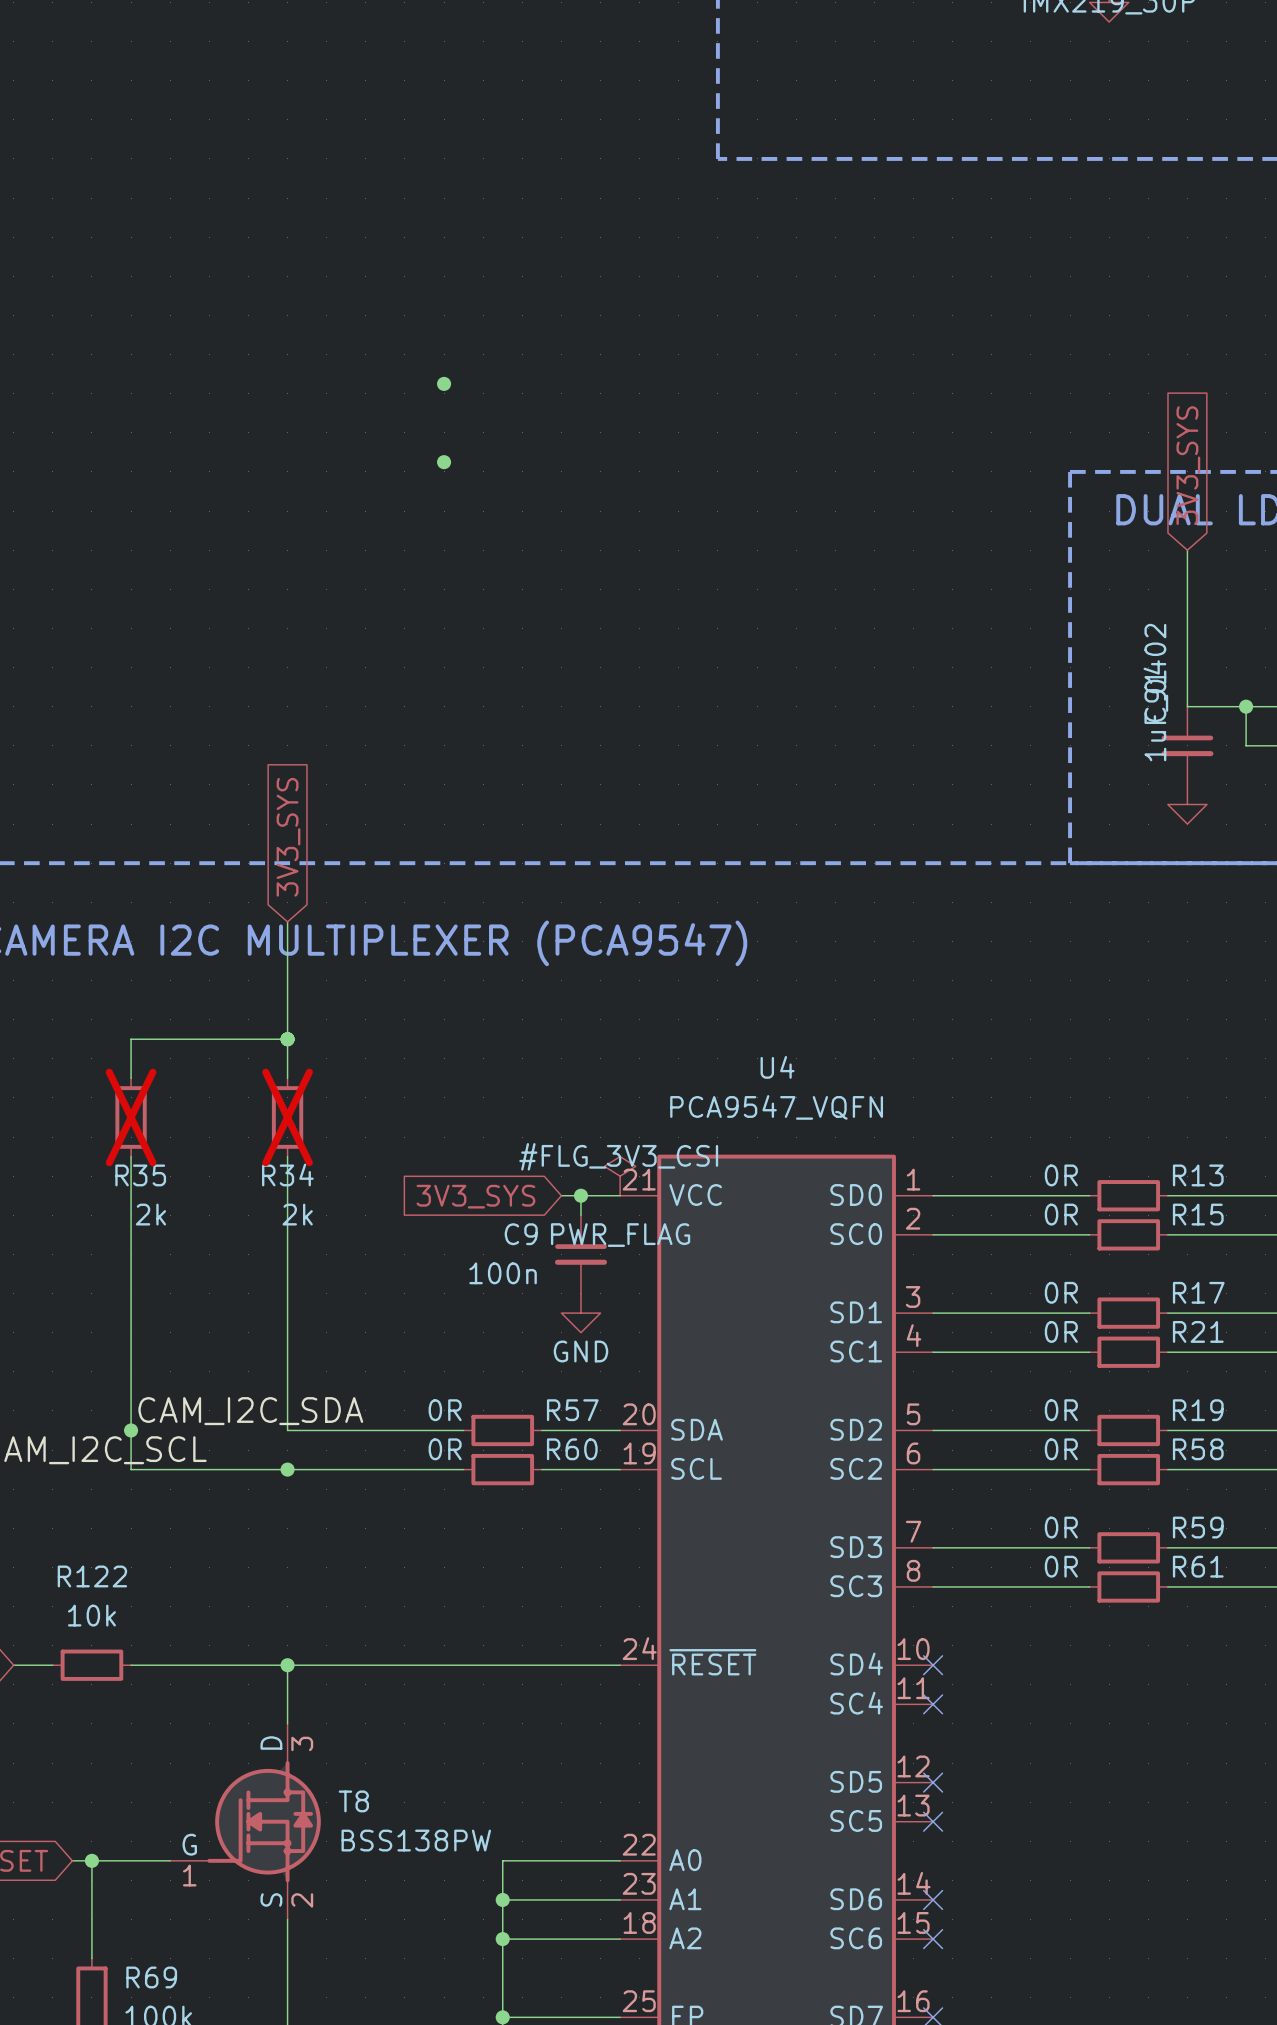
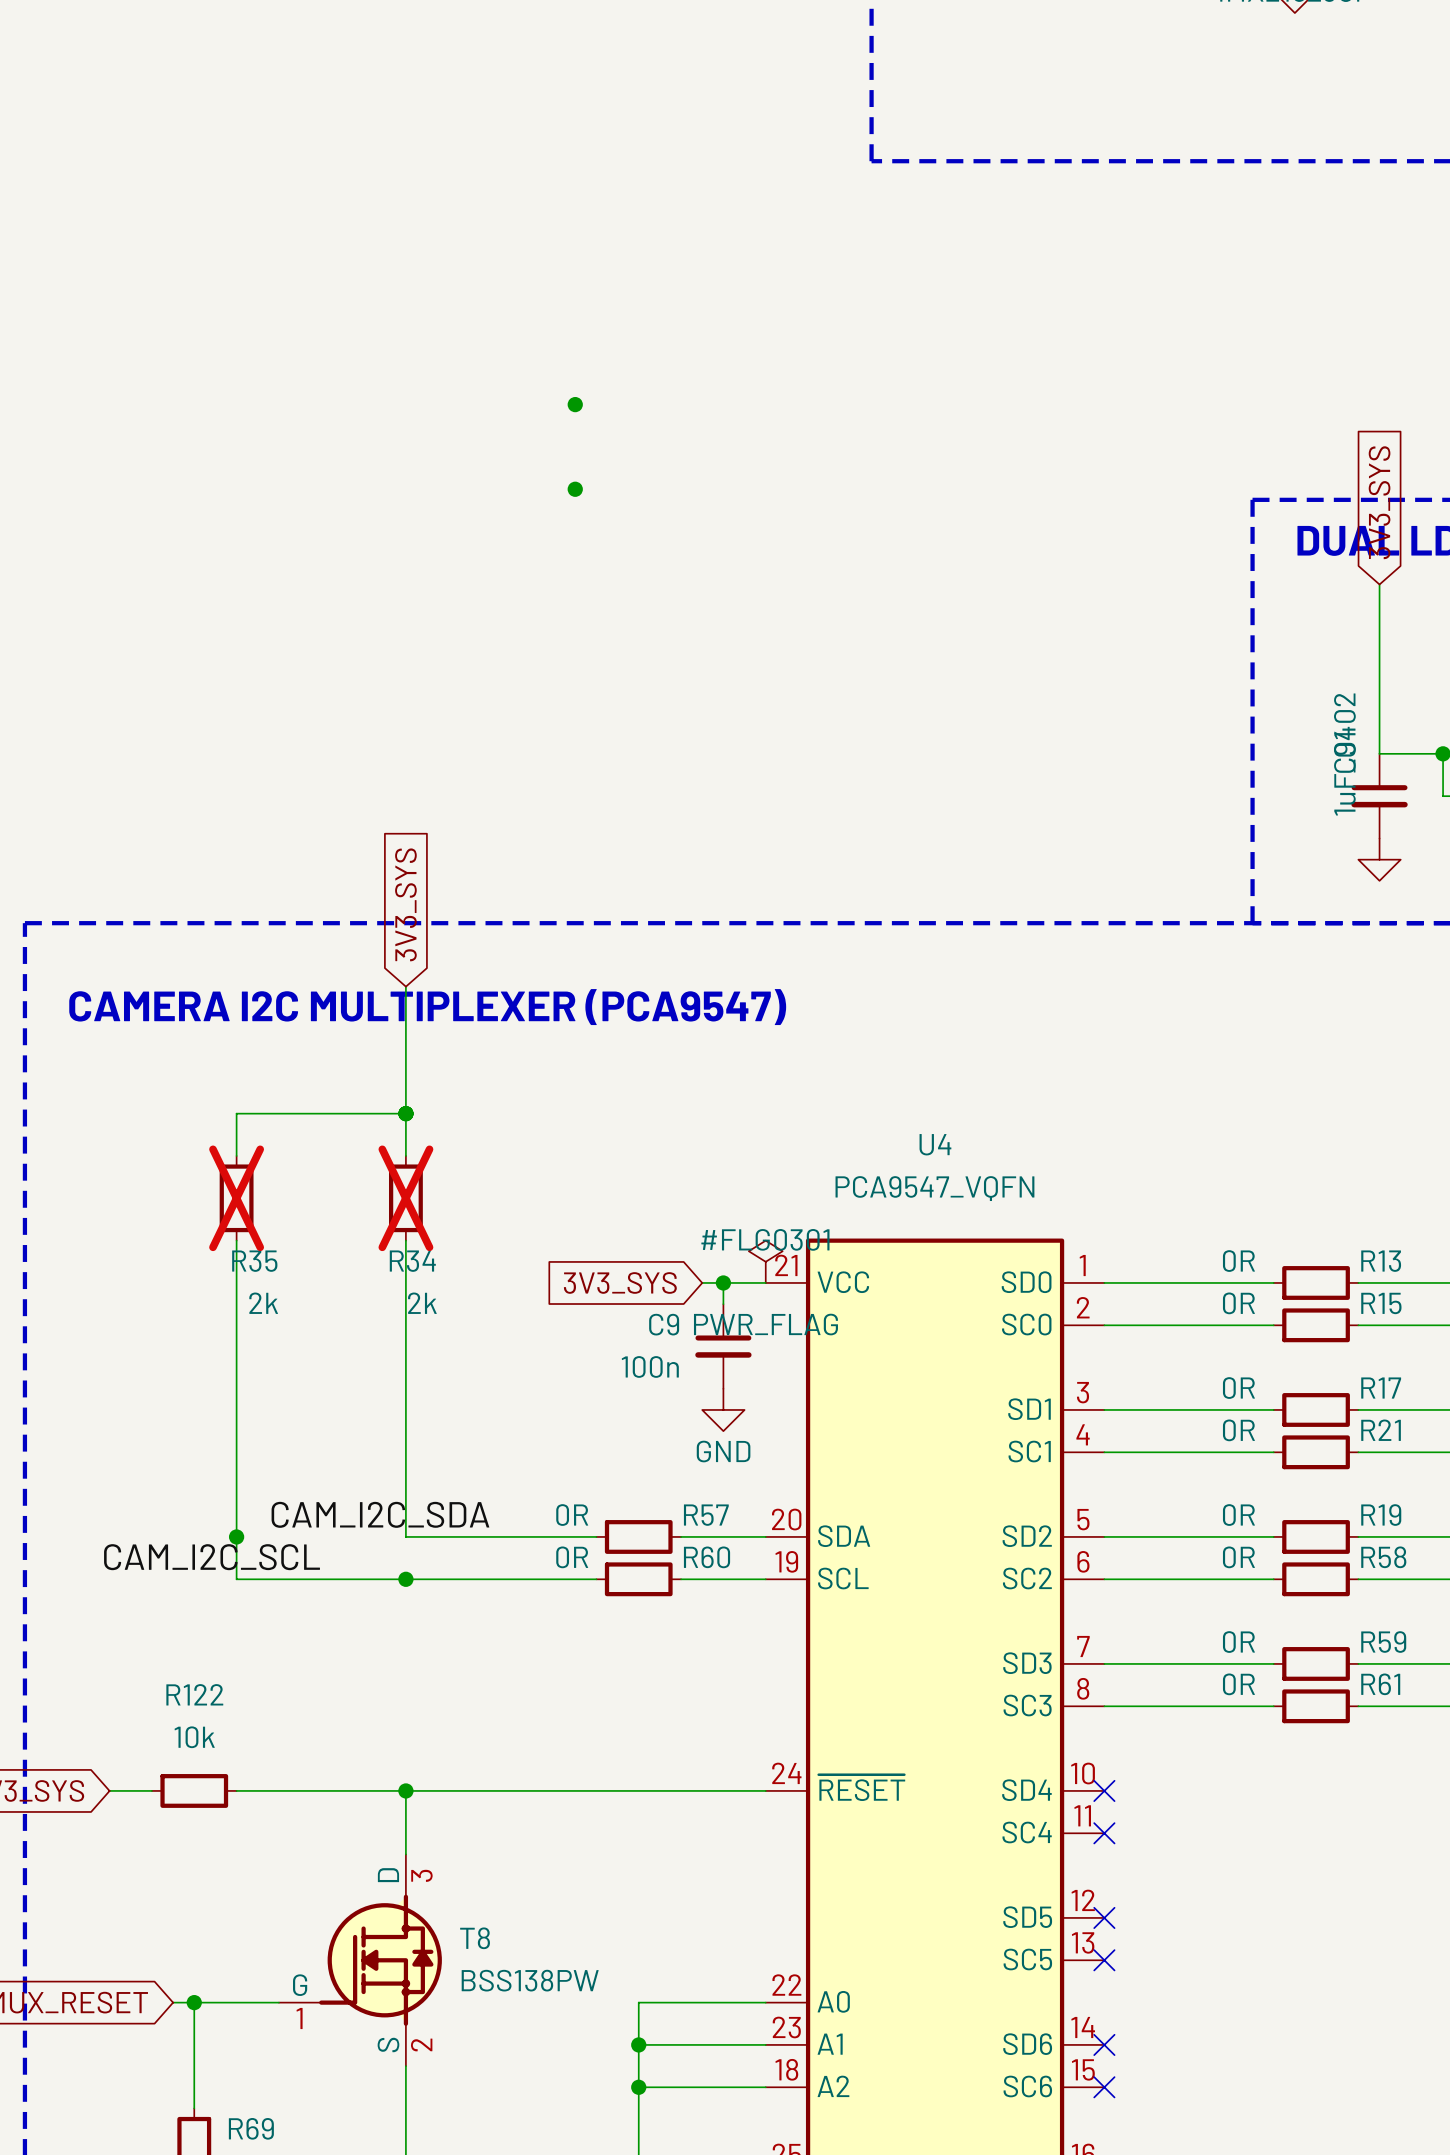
#FLG_3V3_CSI name: #FLG_3V3_CSI (618, 1156) -> #FLG0301 (765, 1239)

